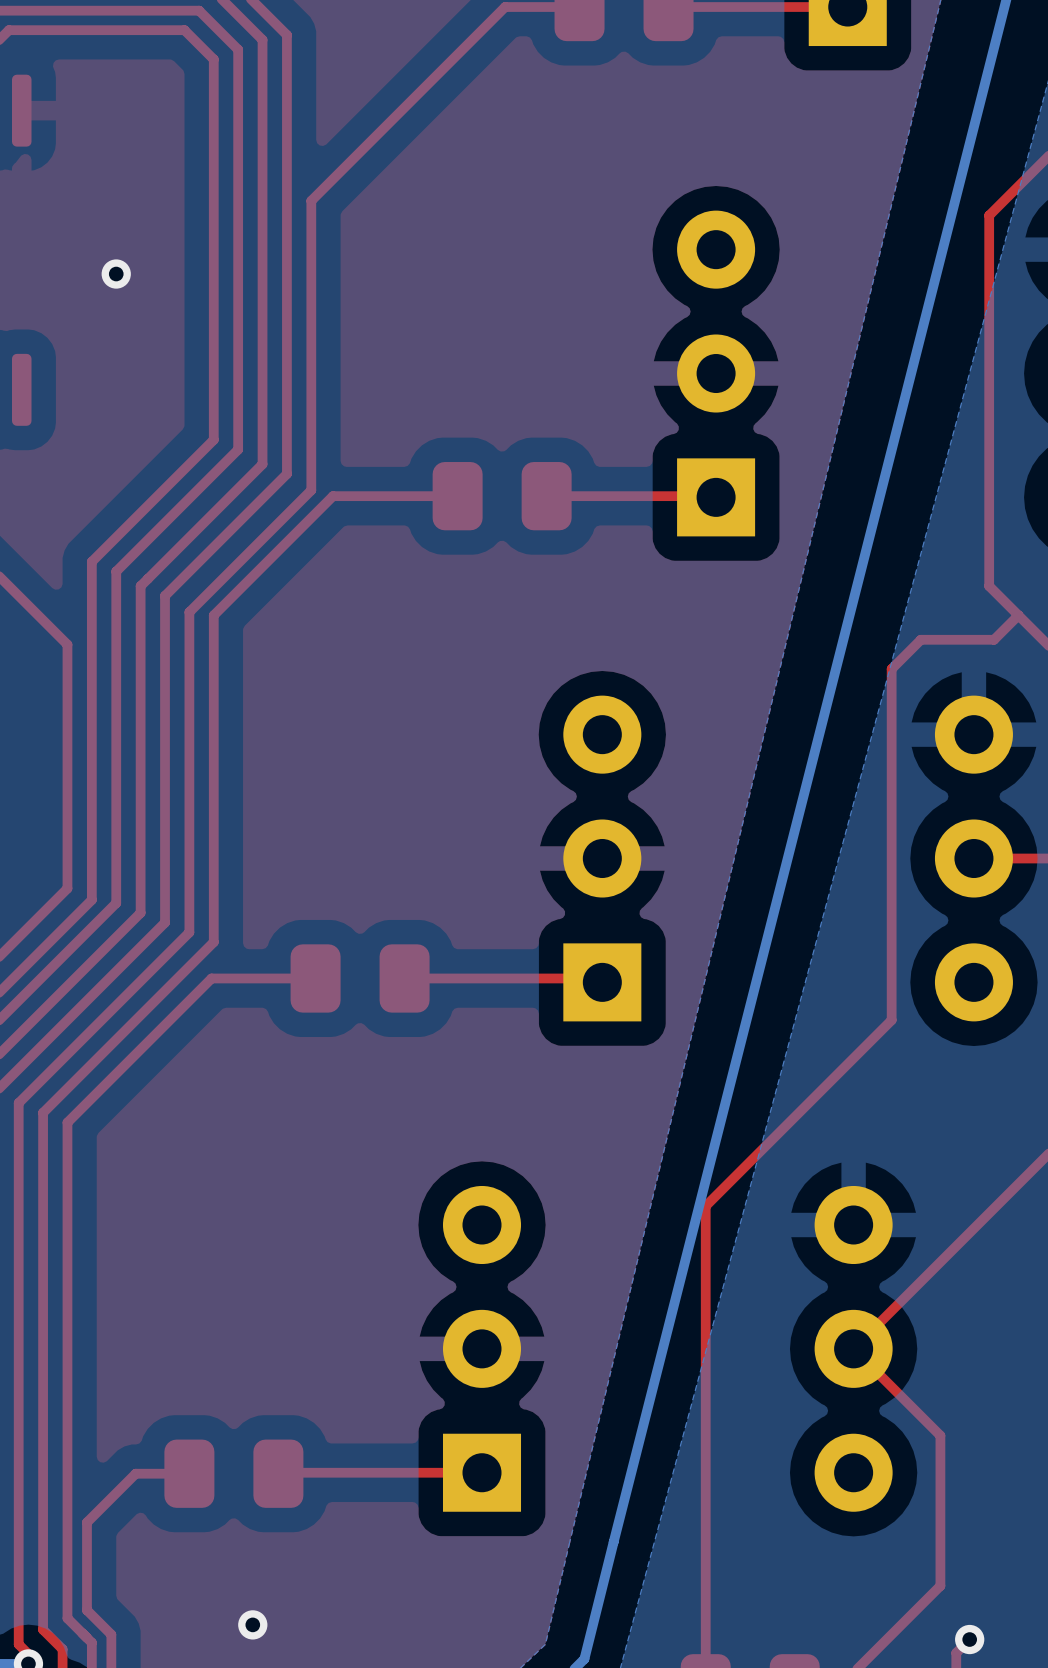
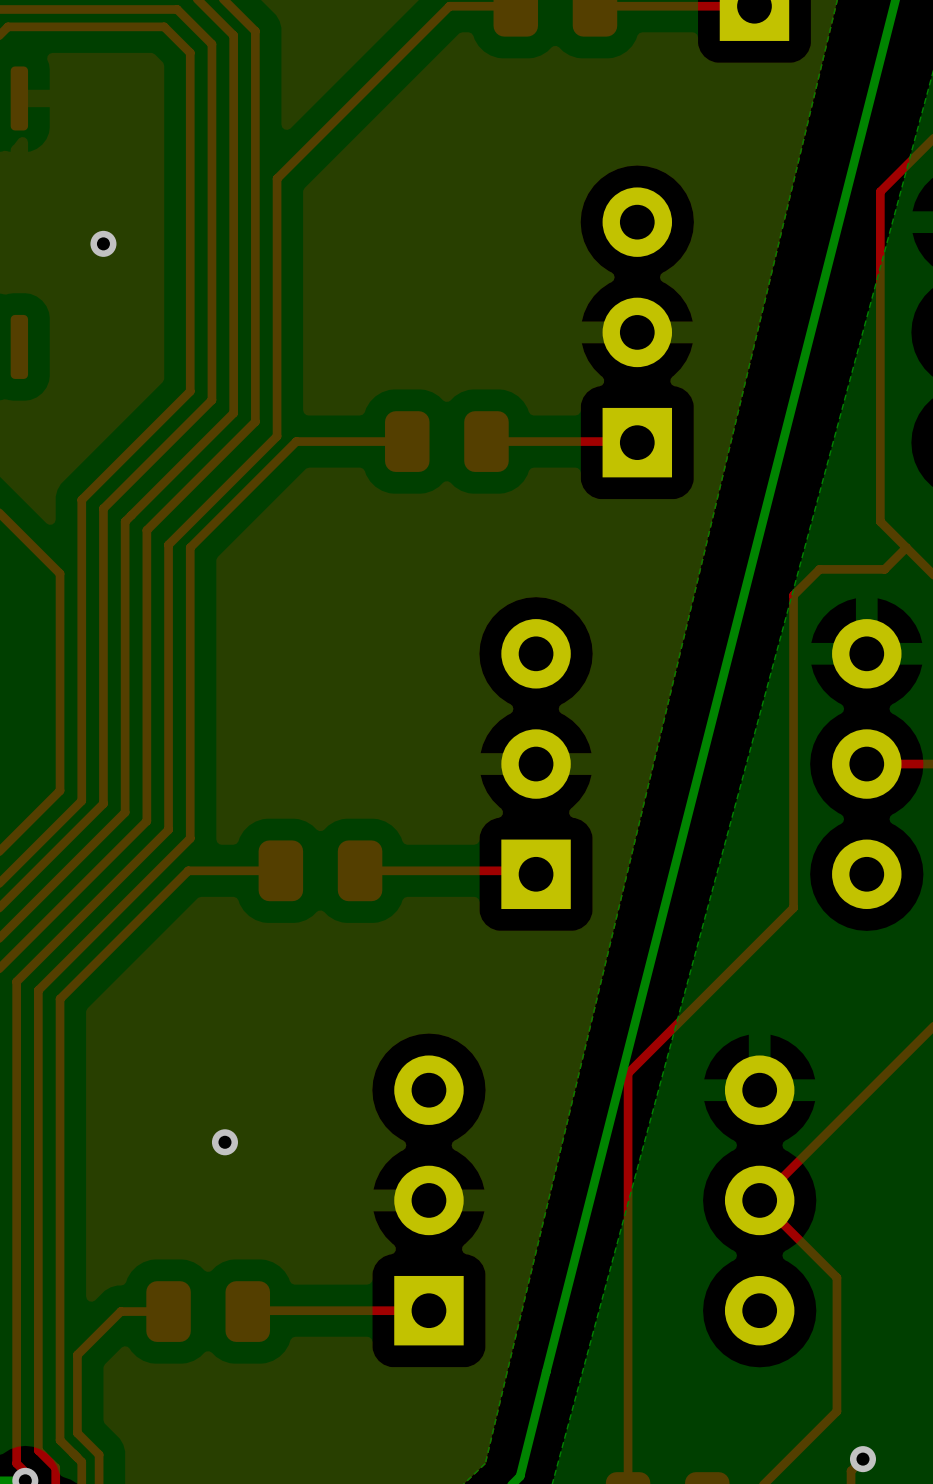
via: none -> (224, 1142)
via: (252, 1624) -> none

